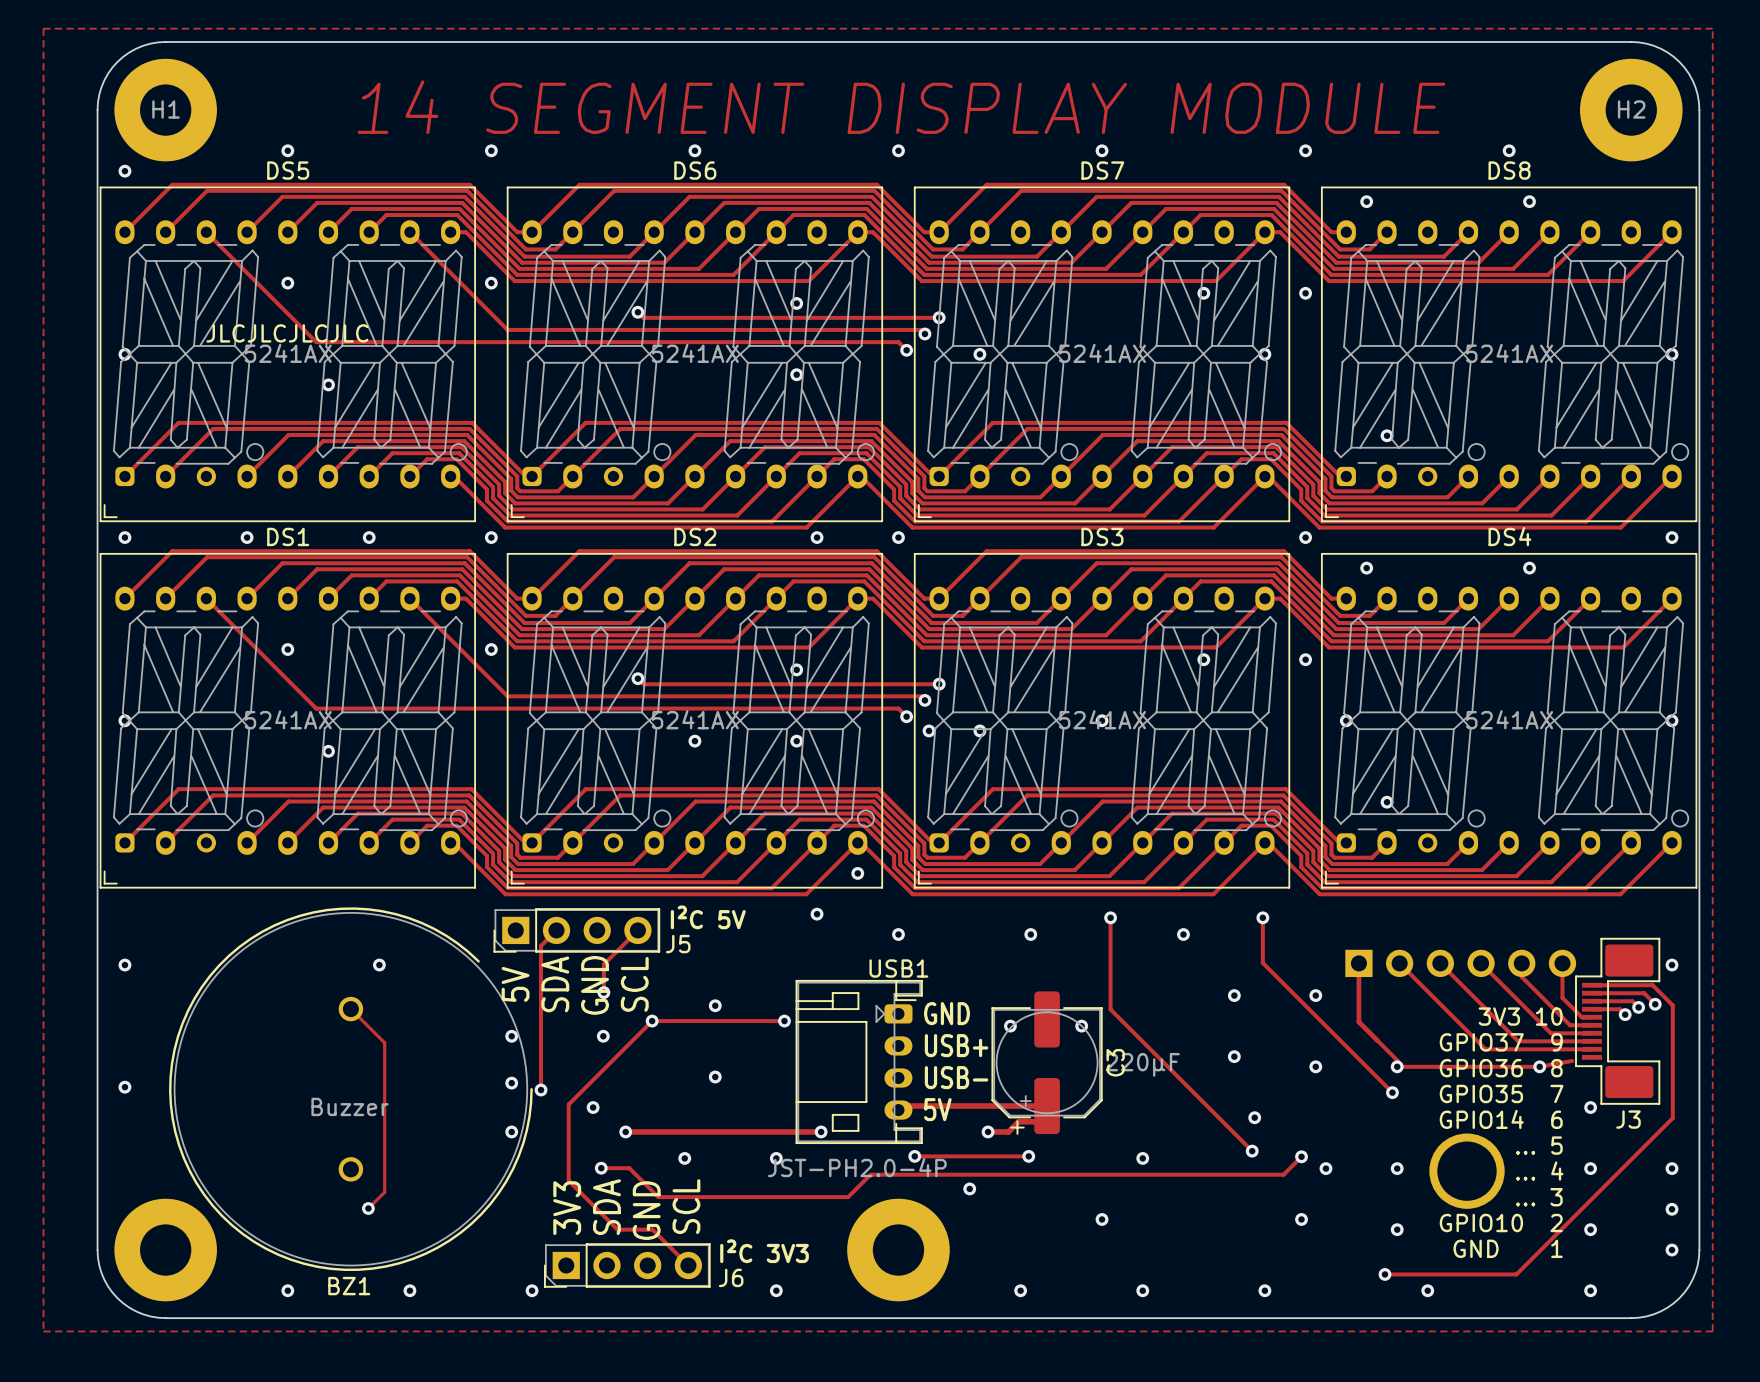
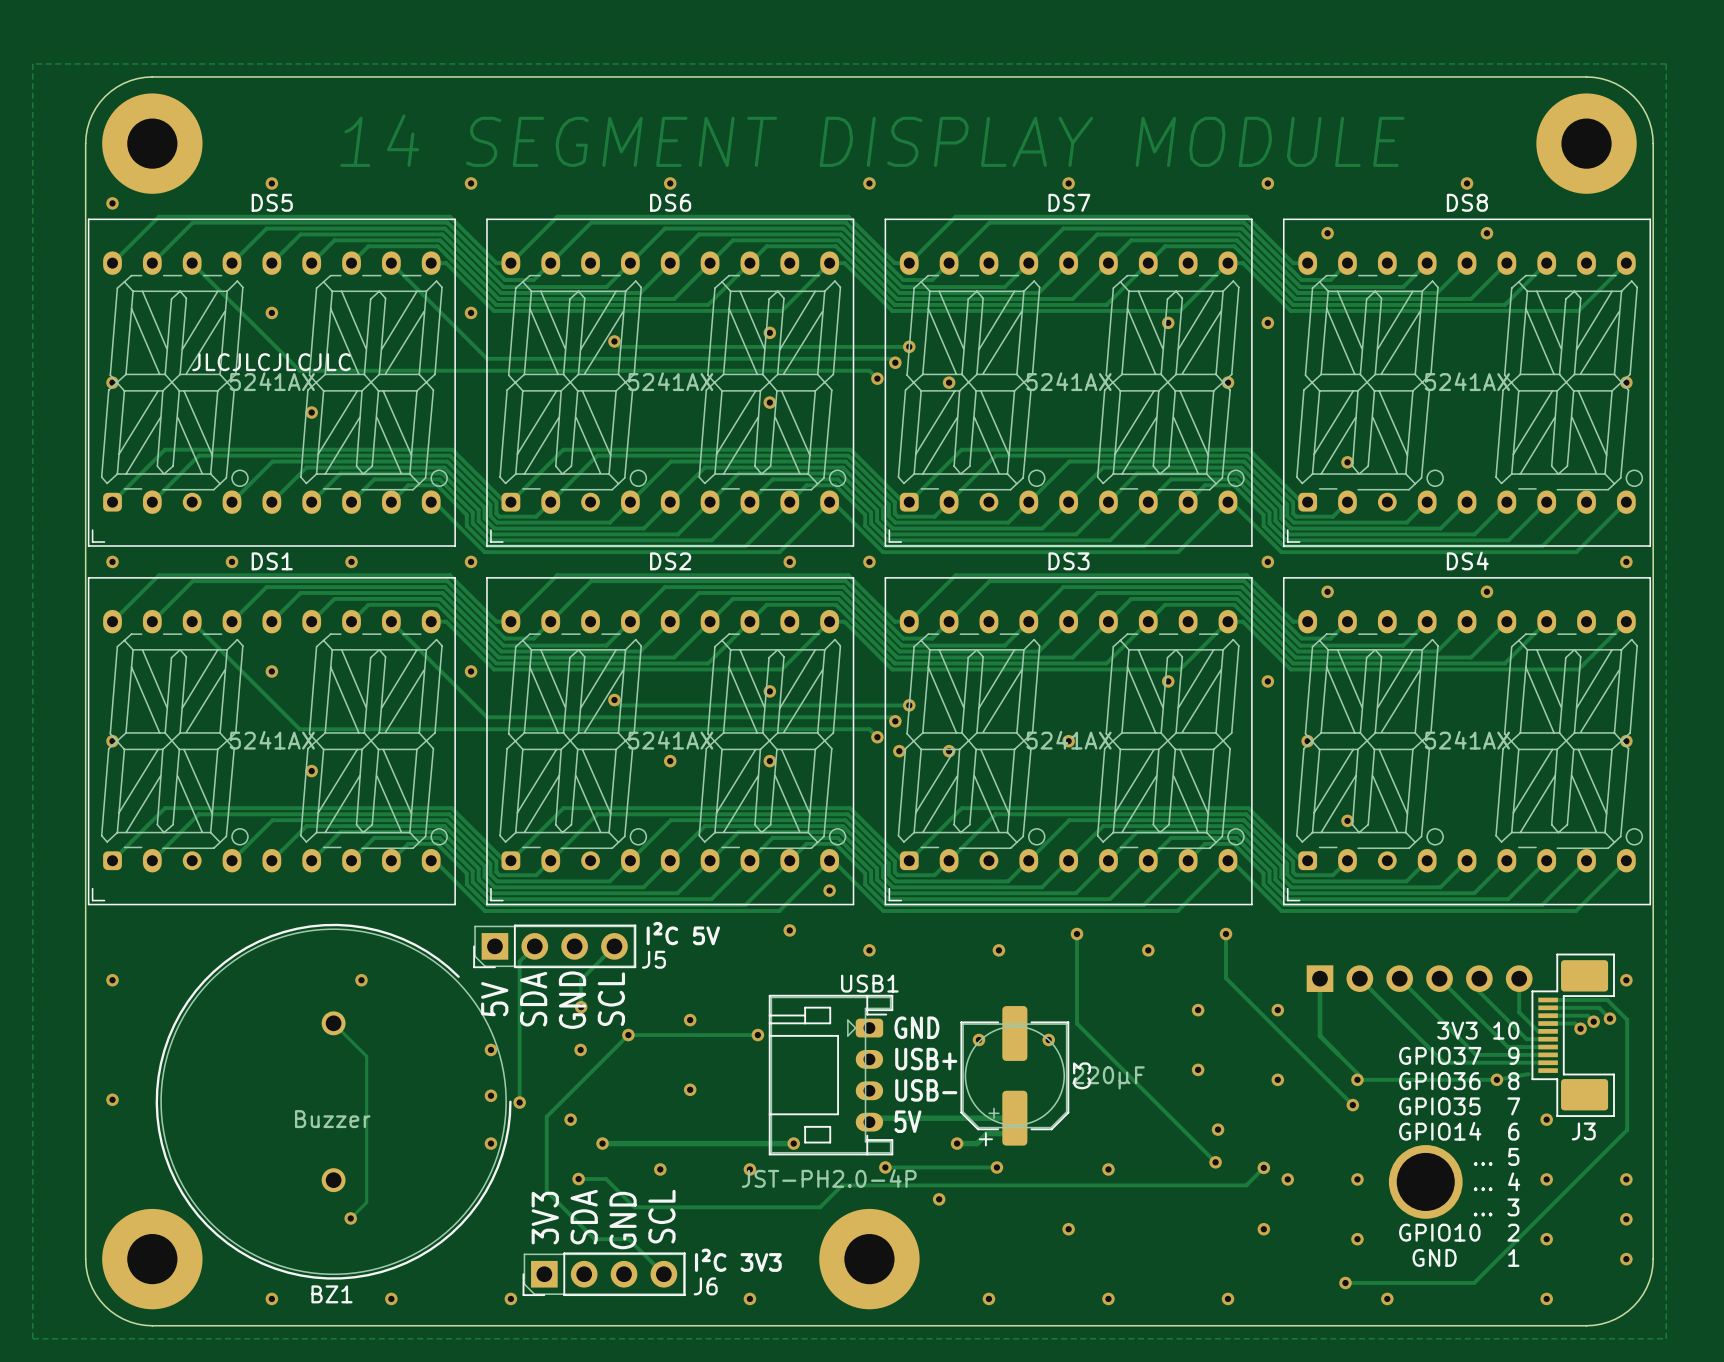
H1 name: H1 (166, 109) -> none
H2 name: H2 (1631, 109) -> none

